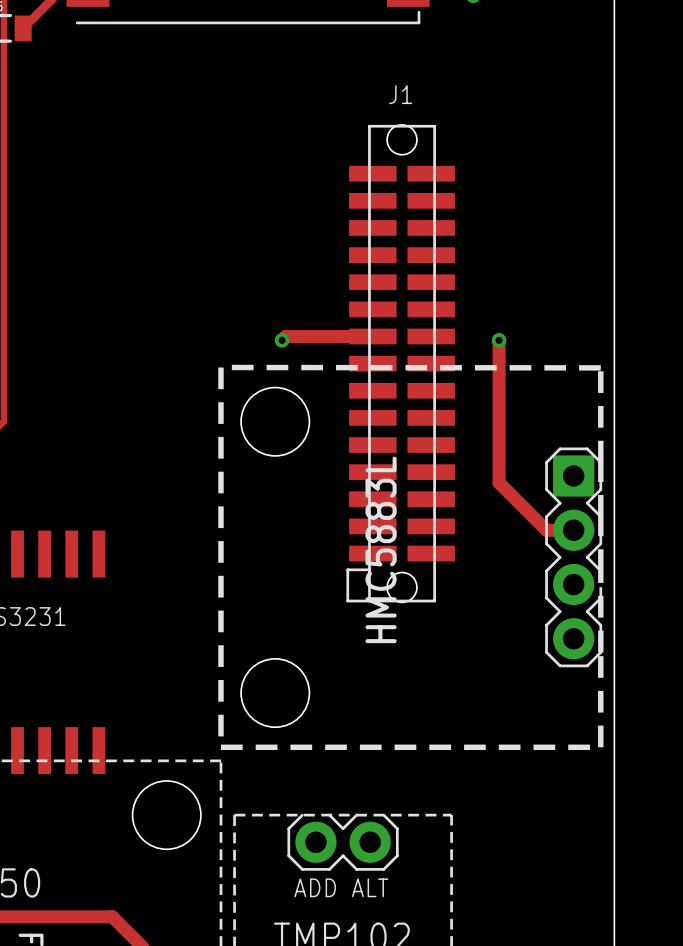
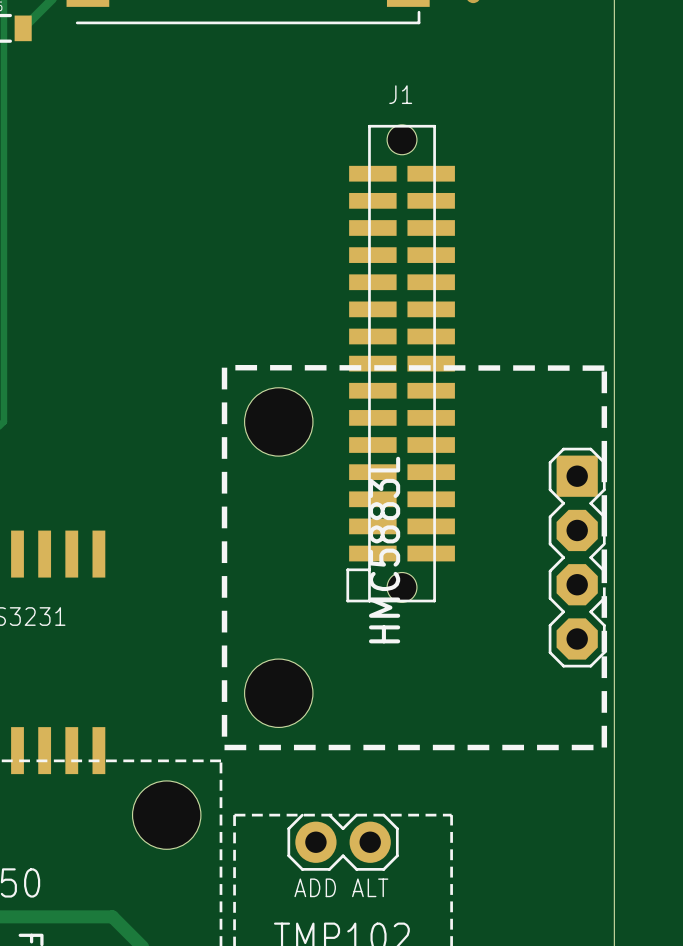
track: (372, 336) (285, 336) (282, 340) -> none
via: (282, 340) -> none
track: (499, 340) (499, 482) (546, 530) (573, 530) -> none
via: (499, 340) -> none
part footprint: [218, 364, 604, 751] -> [221, 364, 608, 751]

